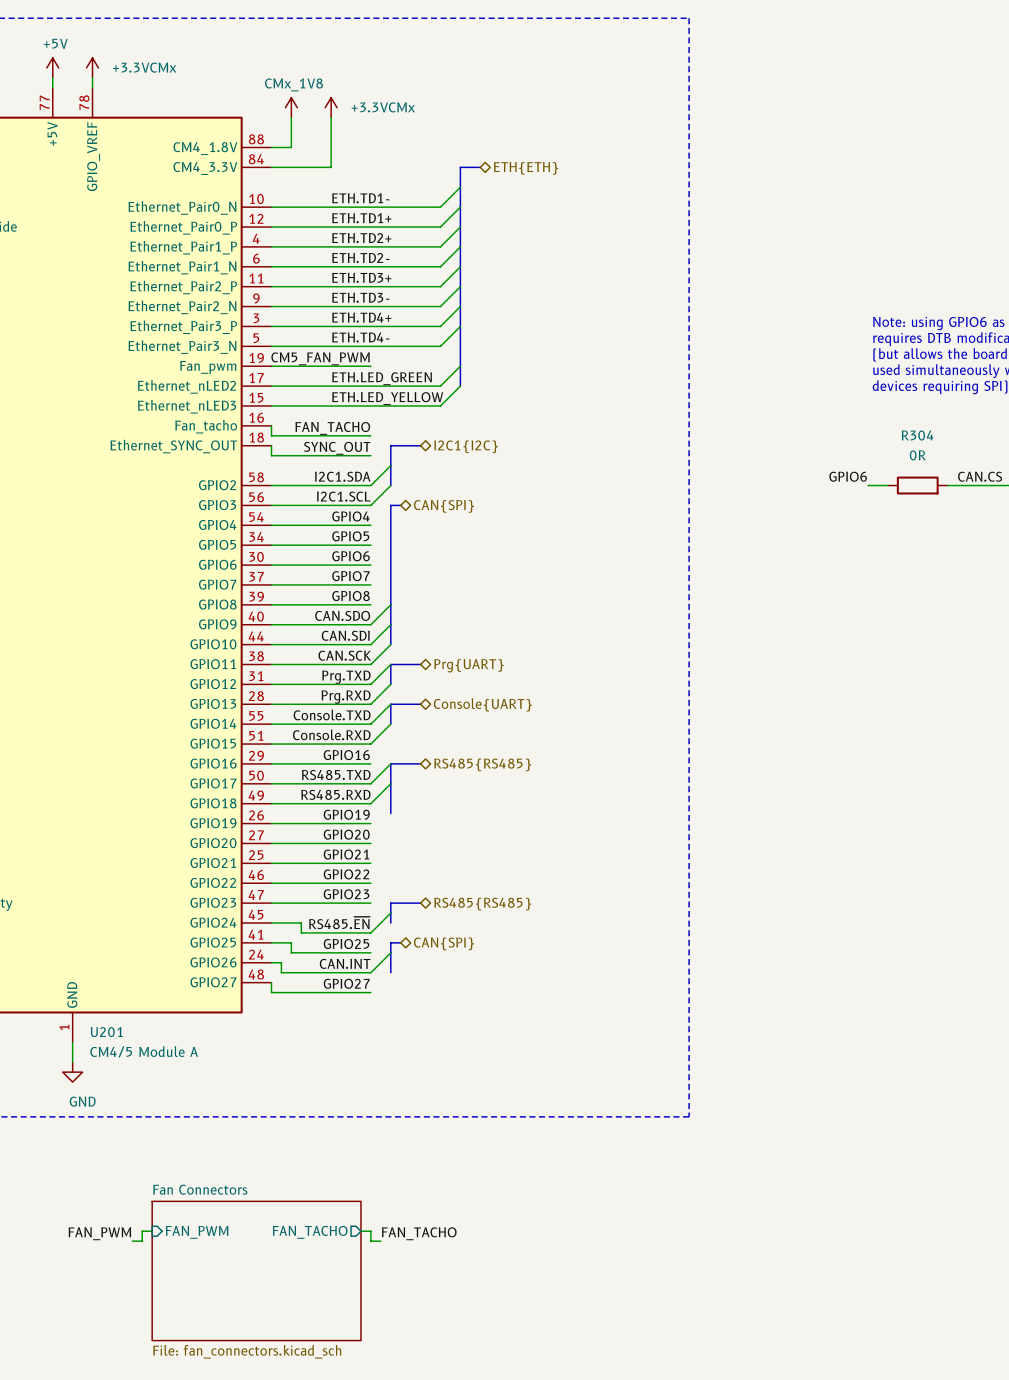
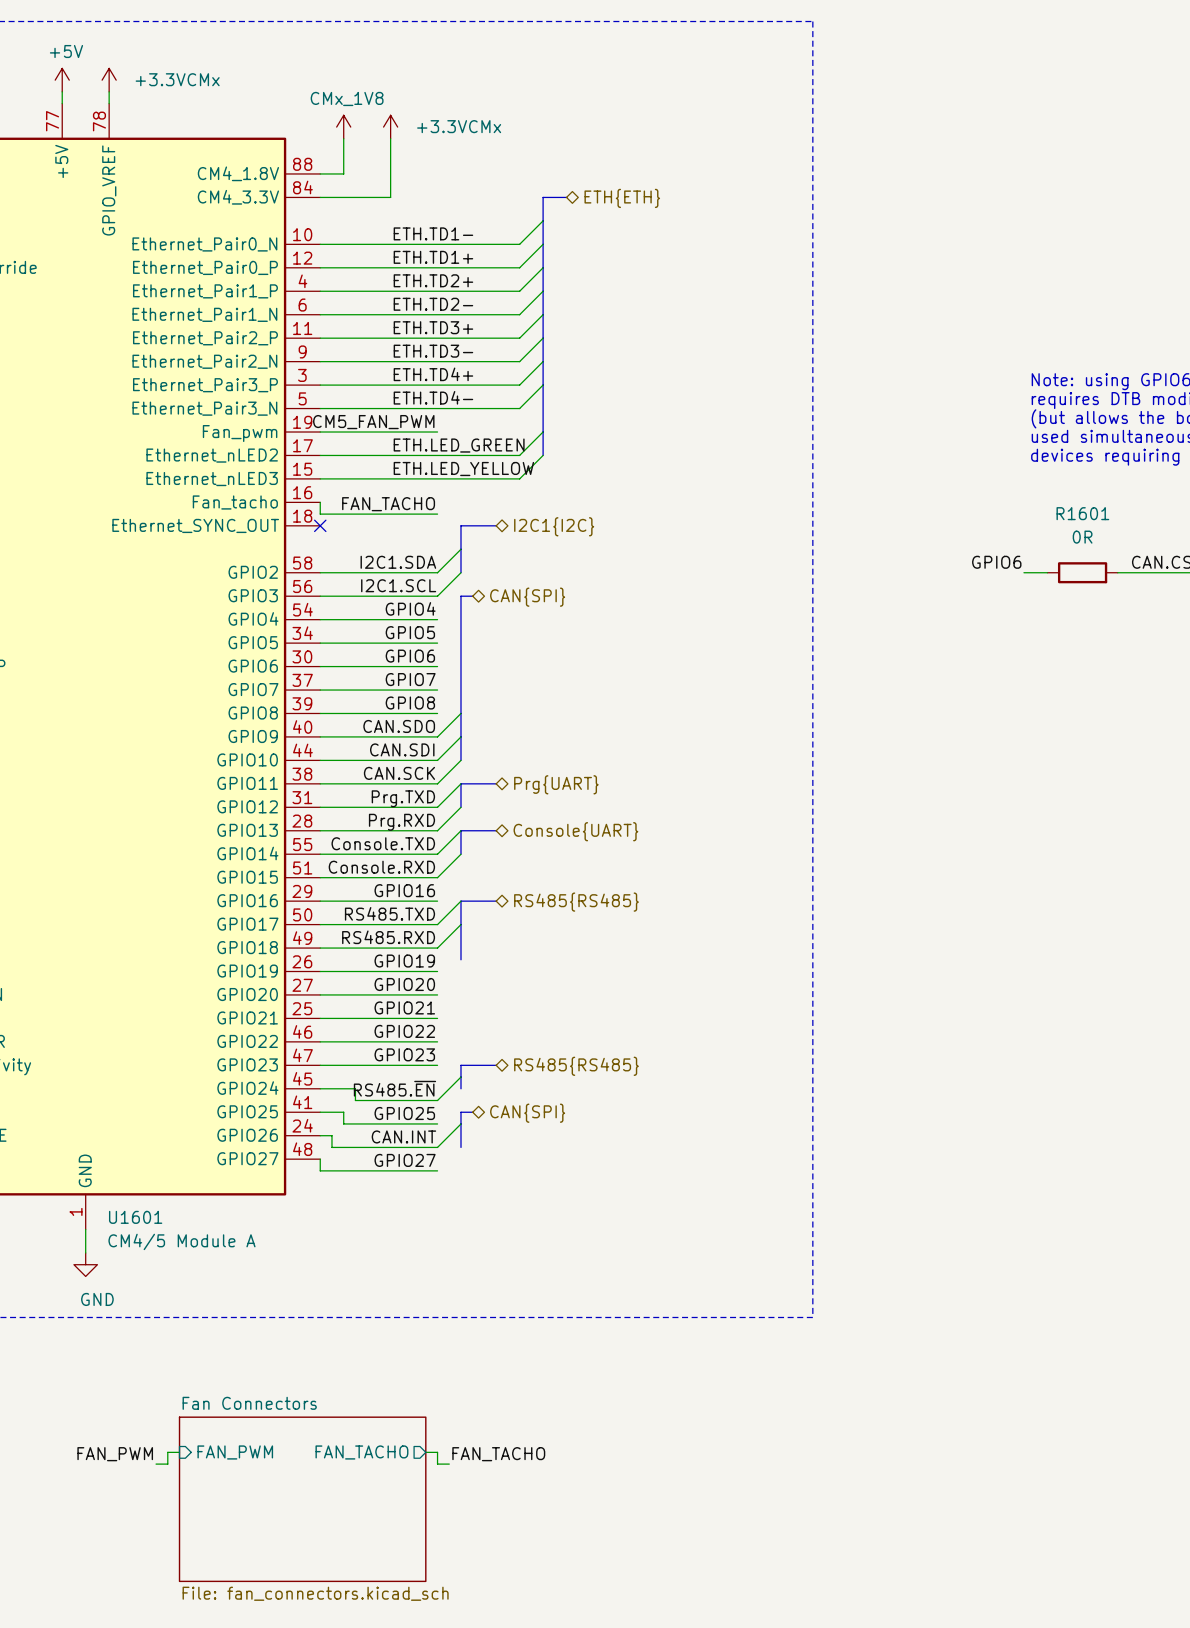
R304 name: R304 (917, 435) -> R1601 (1082, 513)
wire: (271, 445) (271, 455) (370, 455) -> none
no-connect mark: none -> (320, 525)
label: SYNC_OUT (337, 448) -> none
U201 name: U201 (106, 1032) -> U1601 (135, 1217)

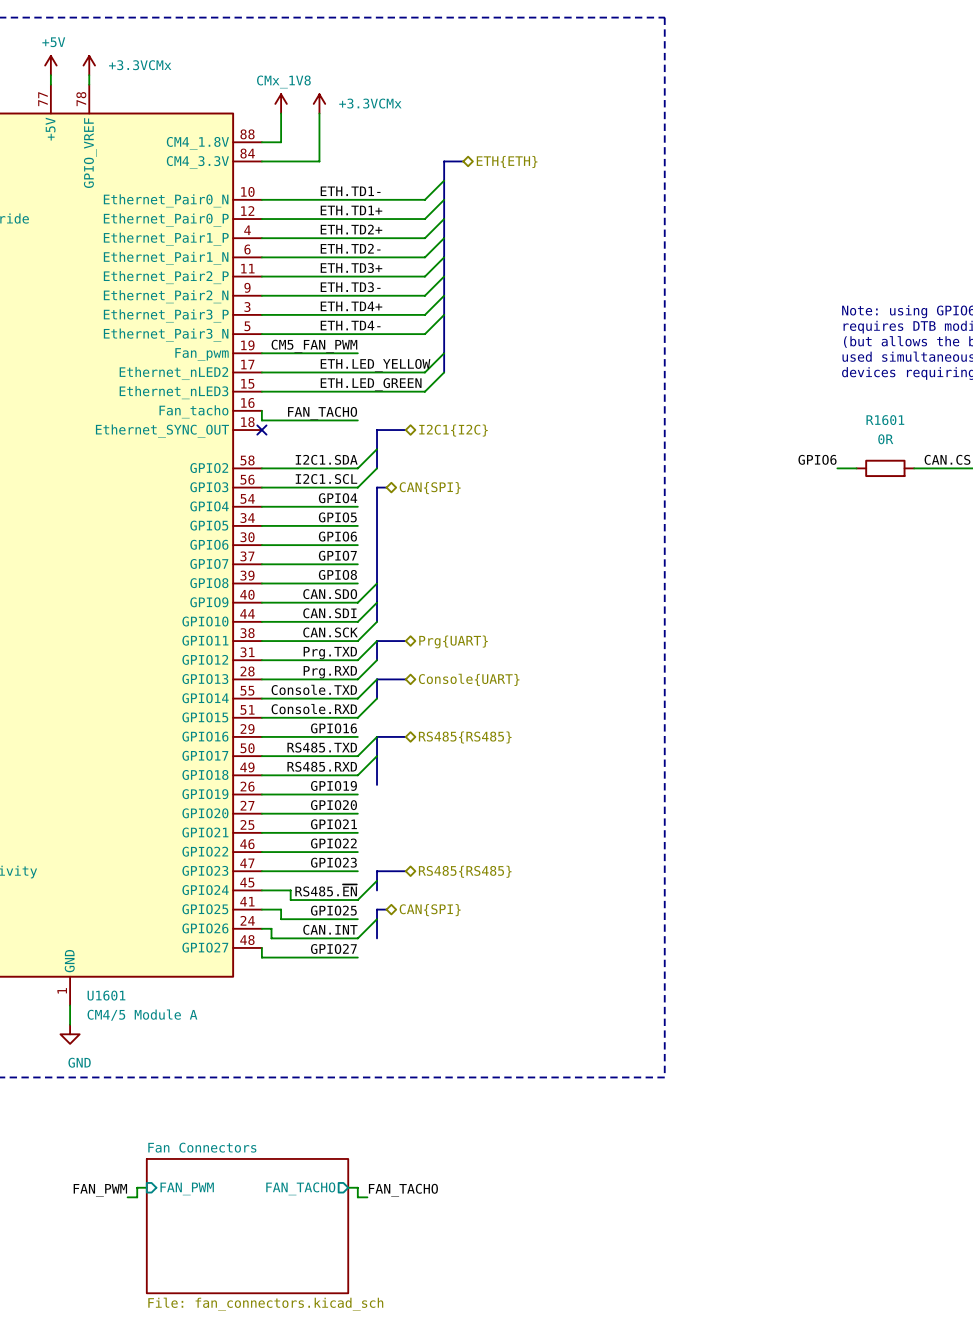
label: ETH.LED_GREEN (459, 445) -> ETH.LED_YELLOW (375, 365)
label: ETH.LED_YELLOW (463, 469) -> ETH.LED_GREEN (371, 384)

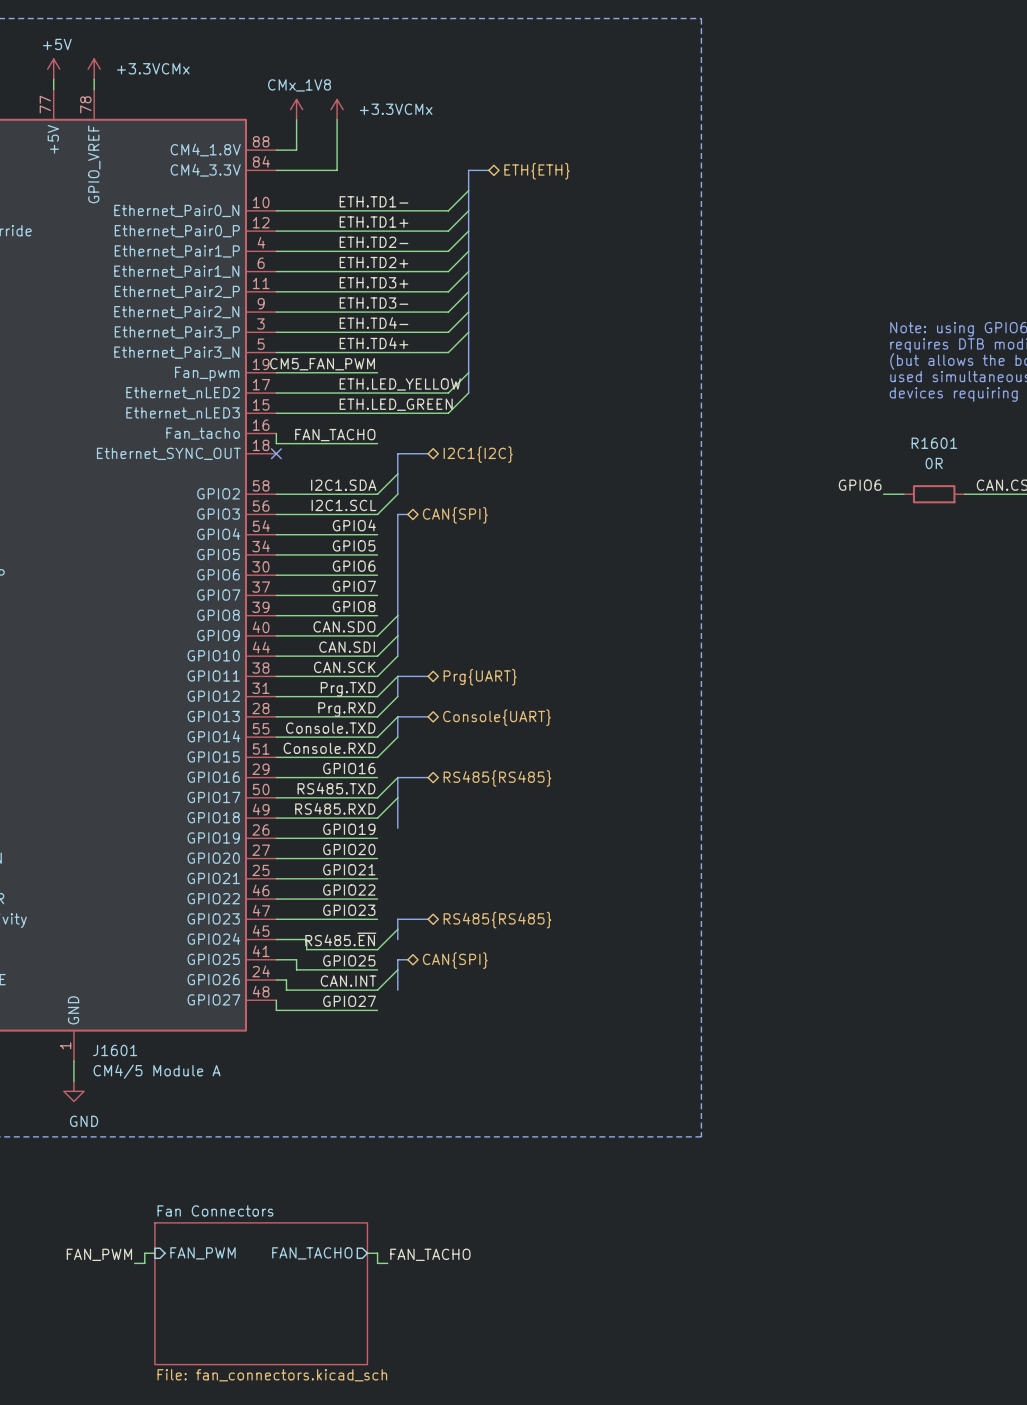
label: ETH.TD2+ (351, 229) -> ETH.TD2- (374, 242)
label: ETH.TD2- (350, 248) -> ETH.TD2+ (374, 262)
label: ETH.TD4+ (351, 306) -> ETH.TD4- (374, 323)
label: ETH.TD4- (350, 325) -> ETH.TD4+ (374, 343)
U1601 name: U1601 (106, 995) -> J1601 (115, 1050)

